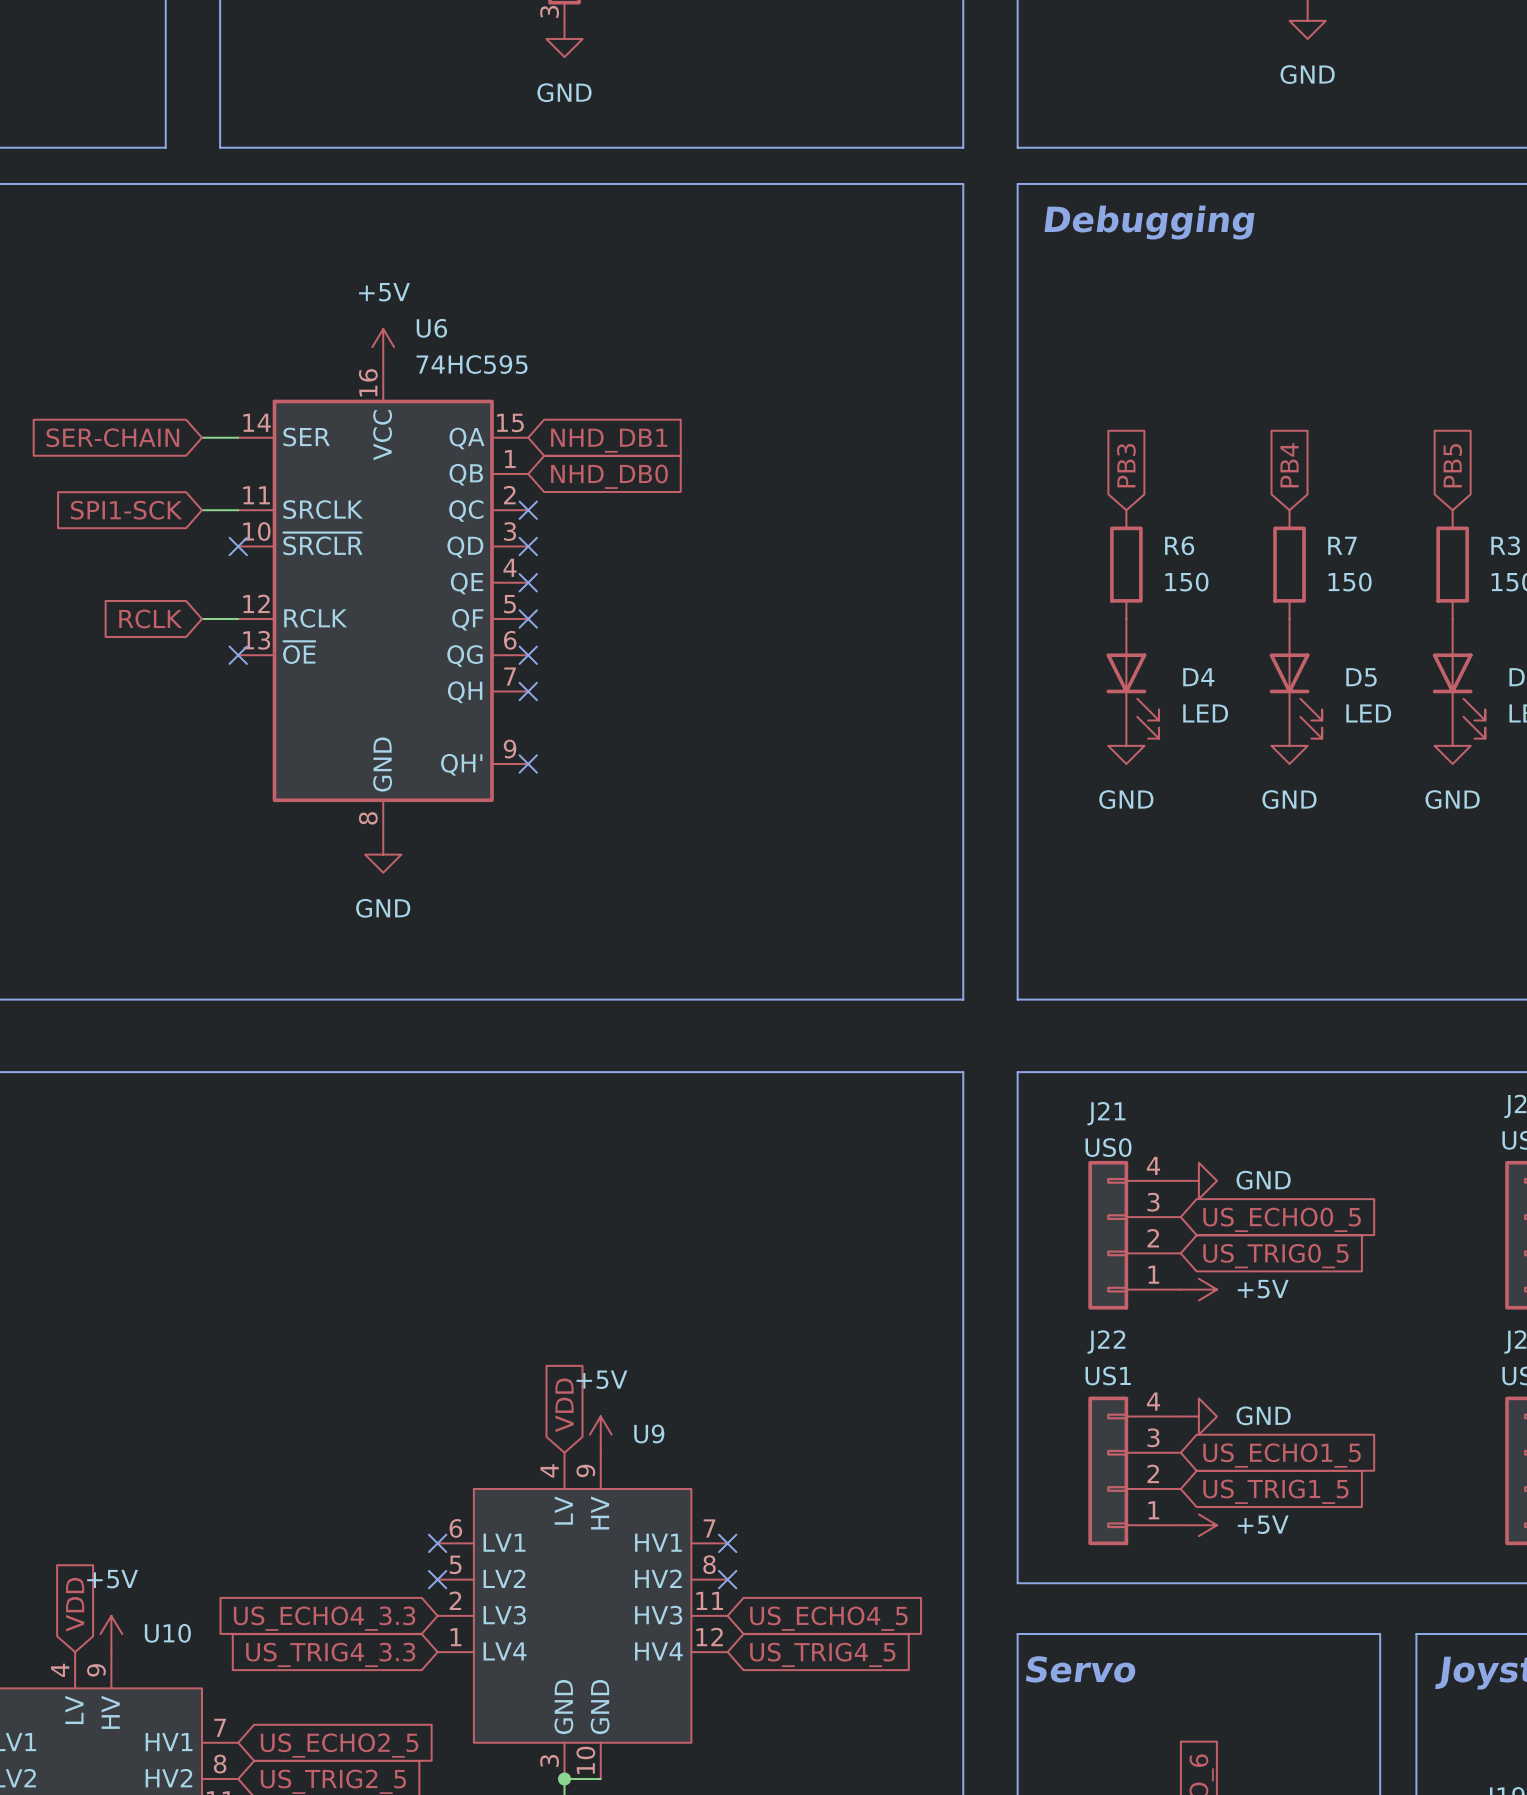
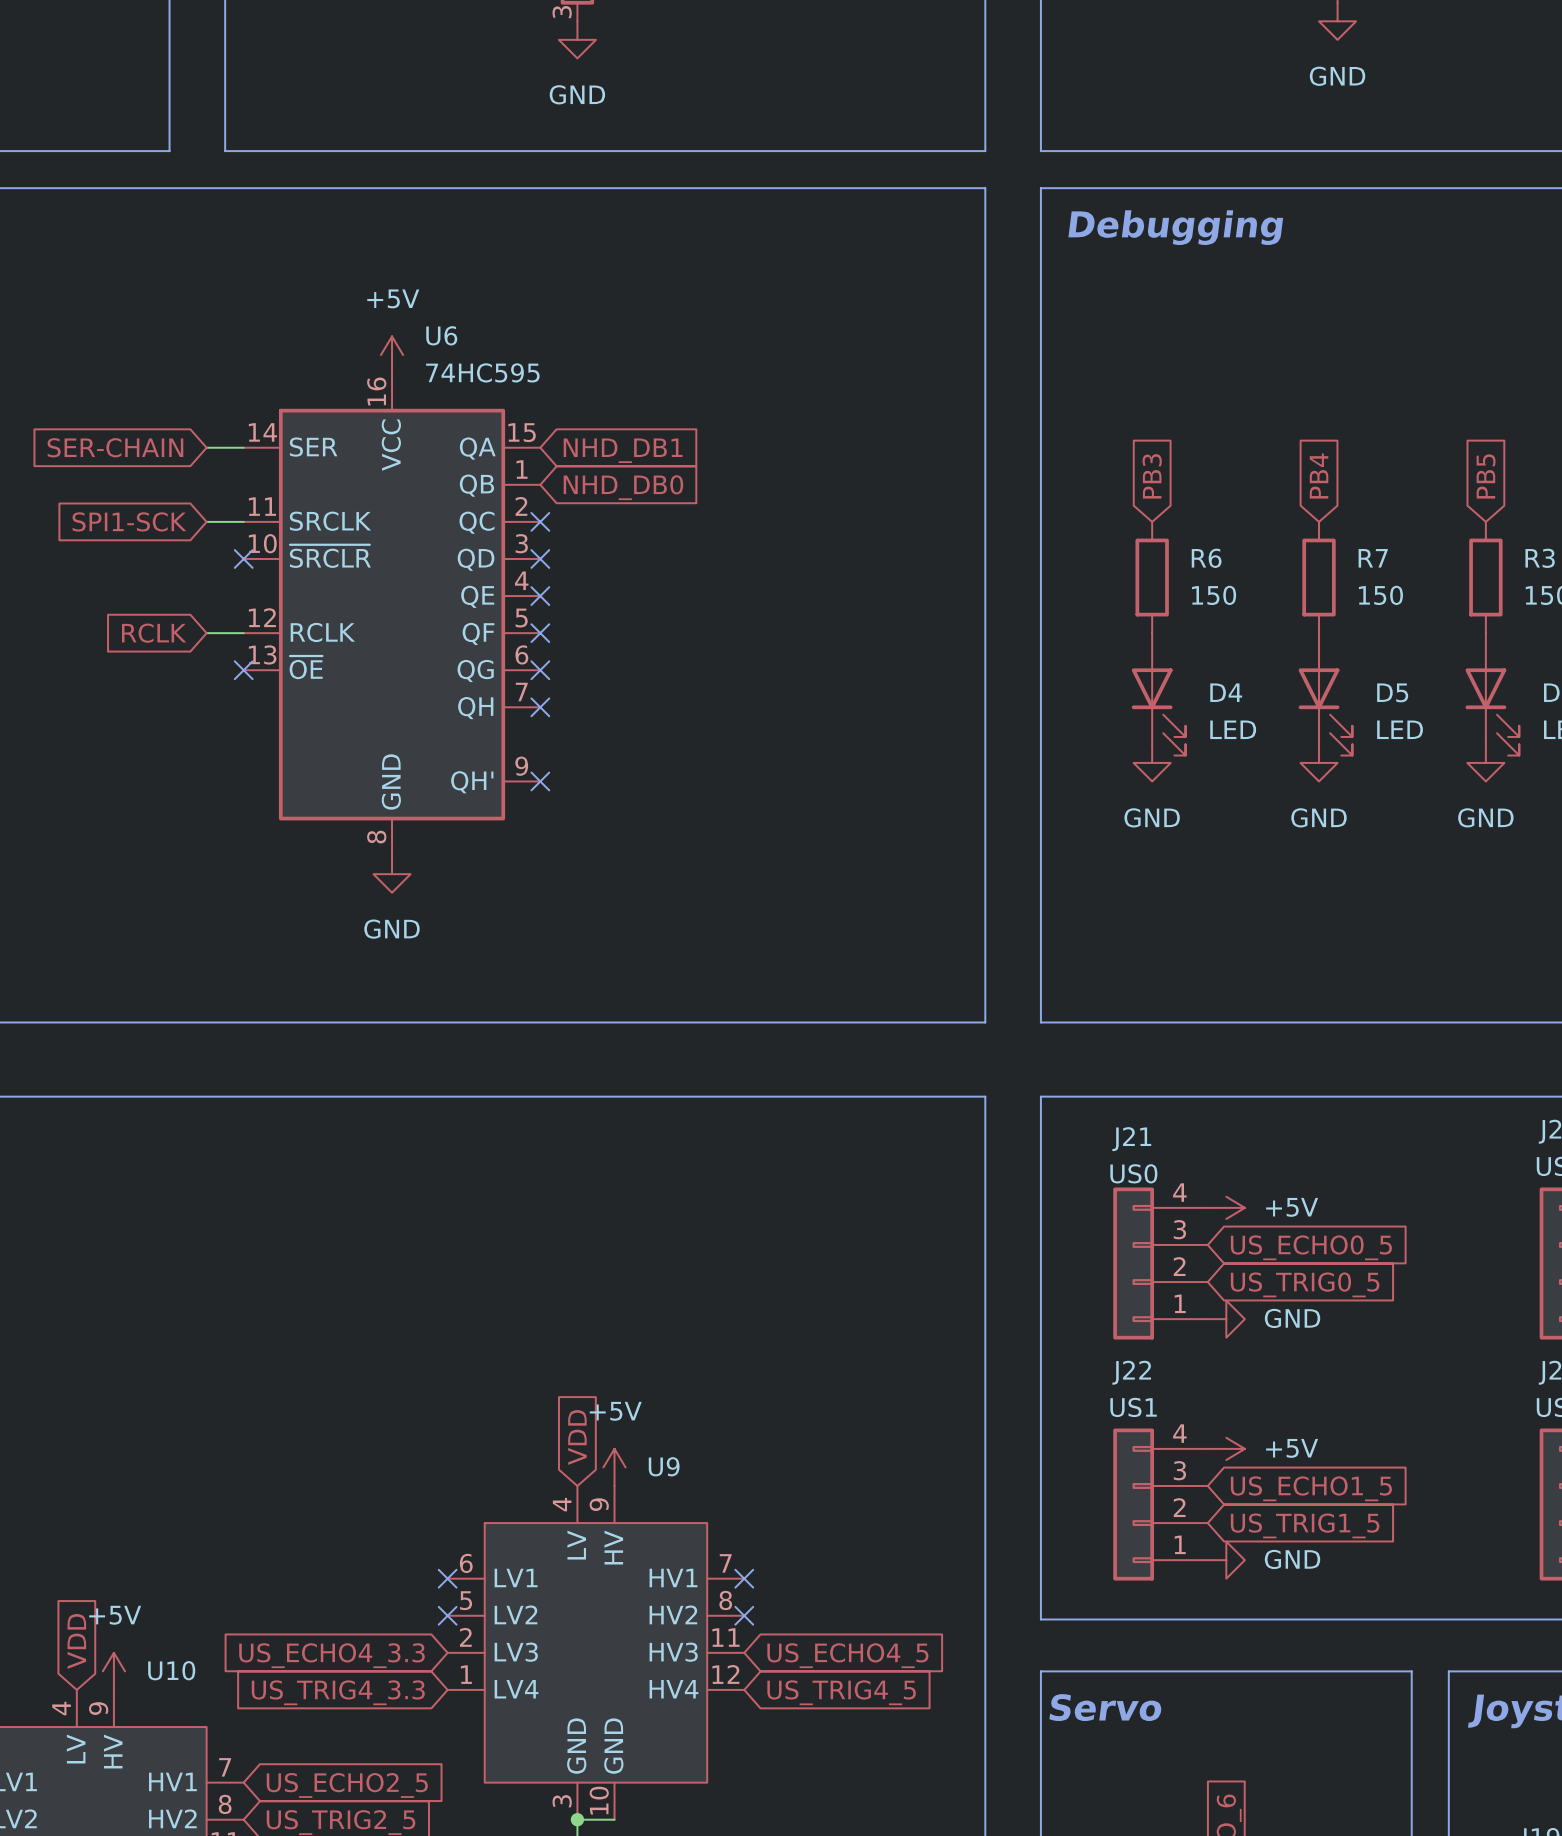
power symbol: GND (1198, 1180) -> +5V (1226, 1207)
power symbol: +5V (1198, 1289) -> GND (1226, 1319)
power symbol: GND (1198, 1416) -> +5V (1226, 1448)
power symbol: +5V (1198, 1525) -> GND (1226, 1560)

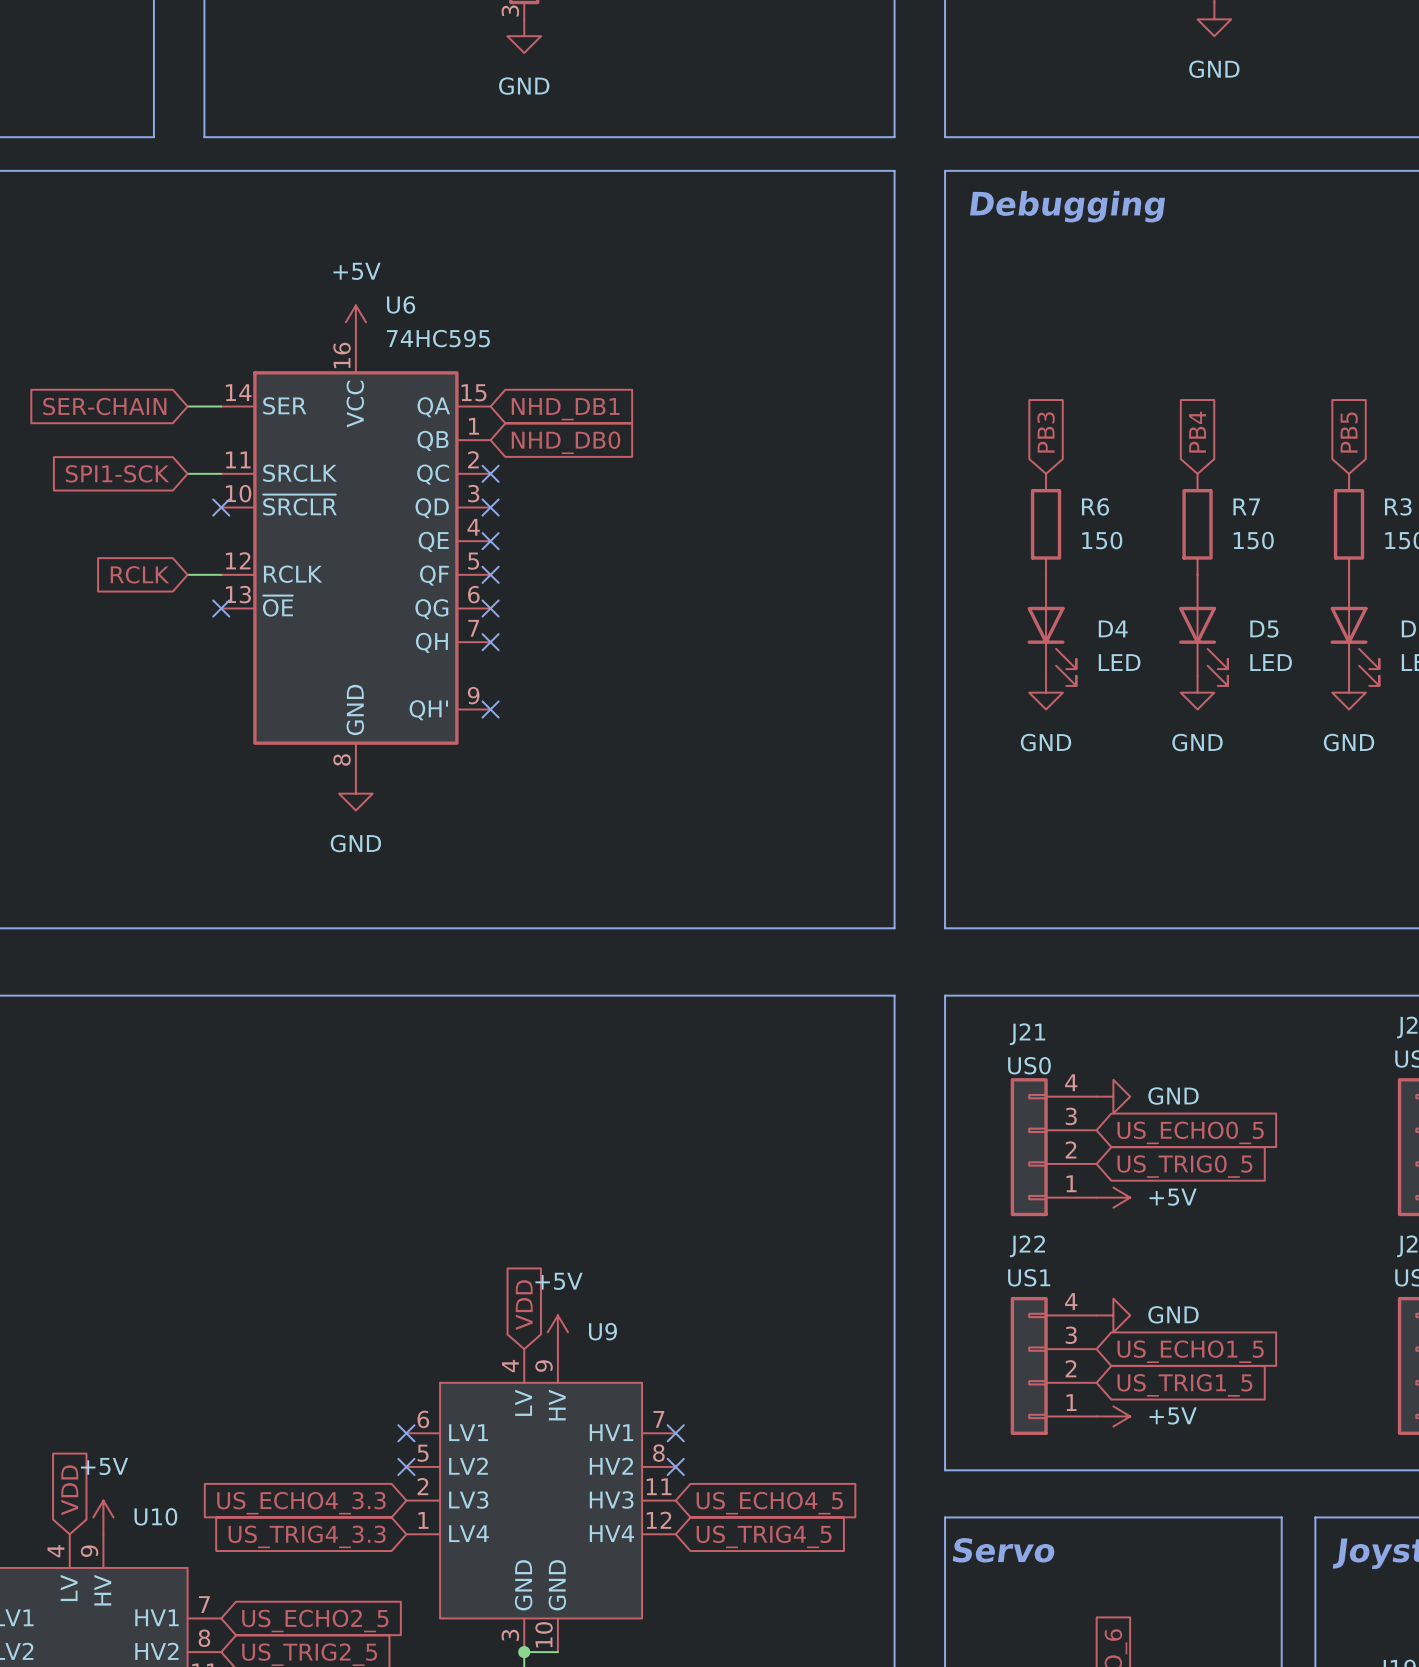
power symbol: +5V (1226, 1207) -> GND (1113, 1096)
power symbol: GND (1226, 1319) -> +5V (1113, 1197)
power symbol: +5V (1226, 1448) -> GND (1113, 1315)
power symbol: GND (1226, 1560) -> +5V (1113, 1416)

